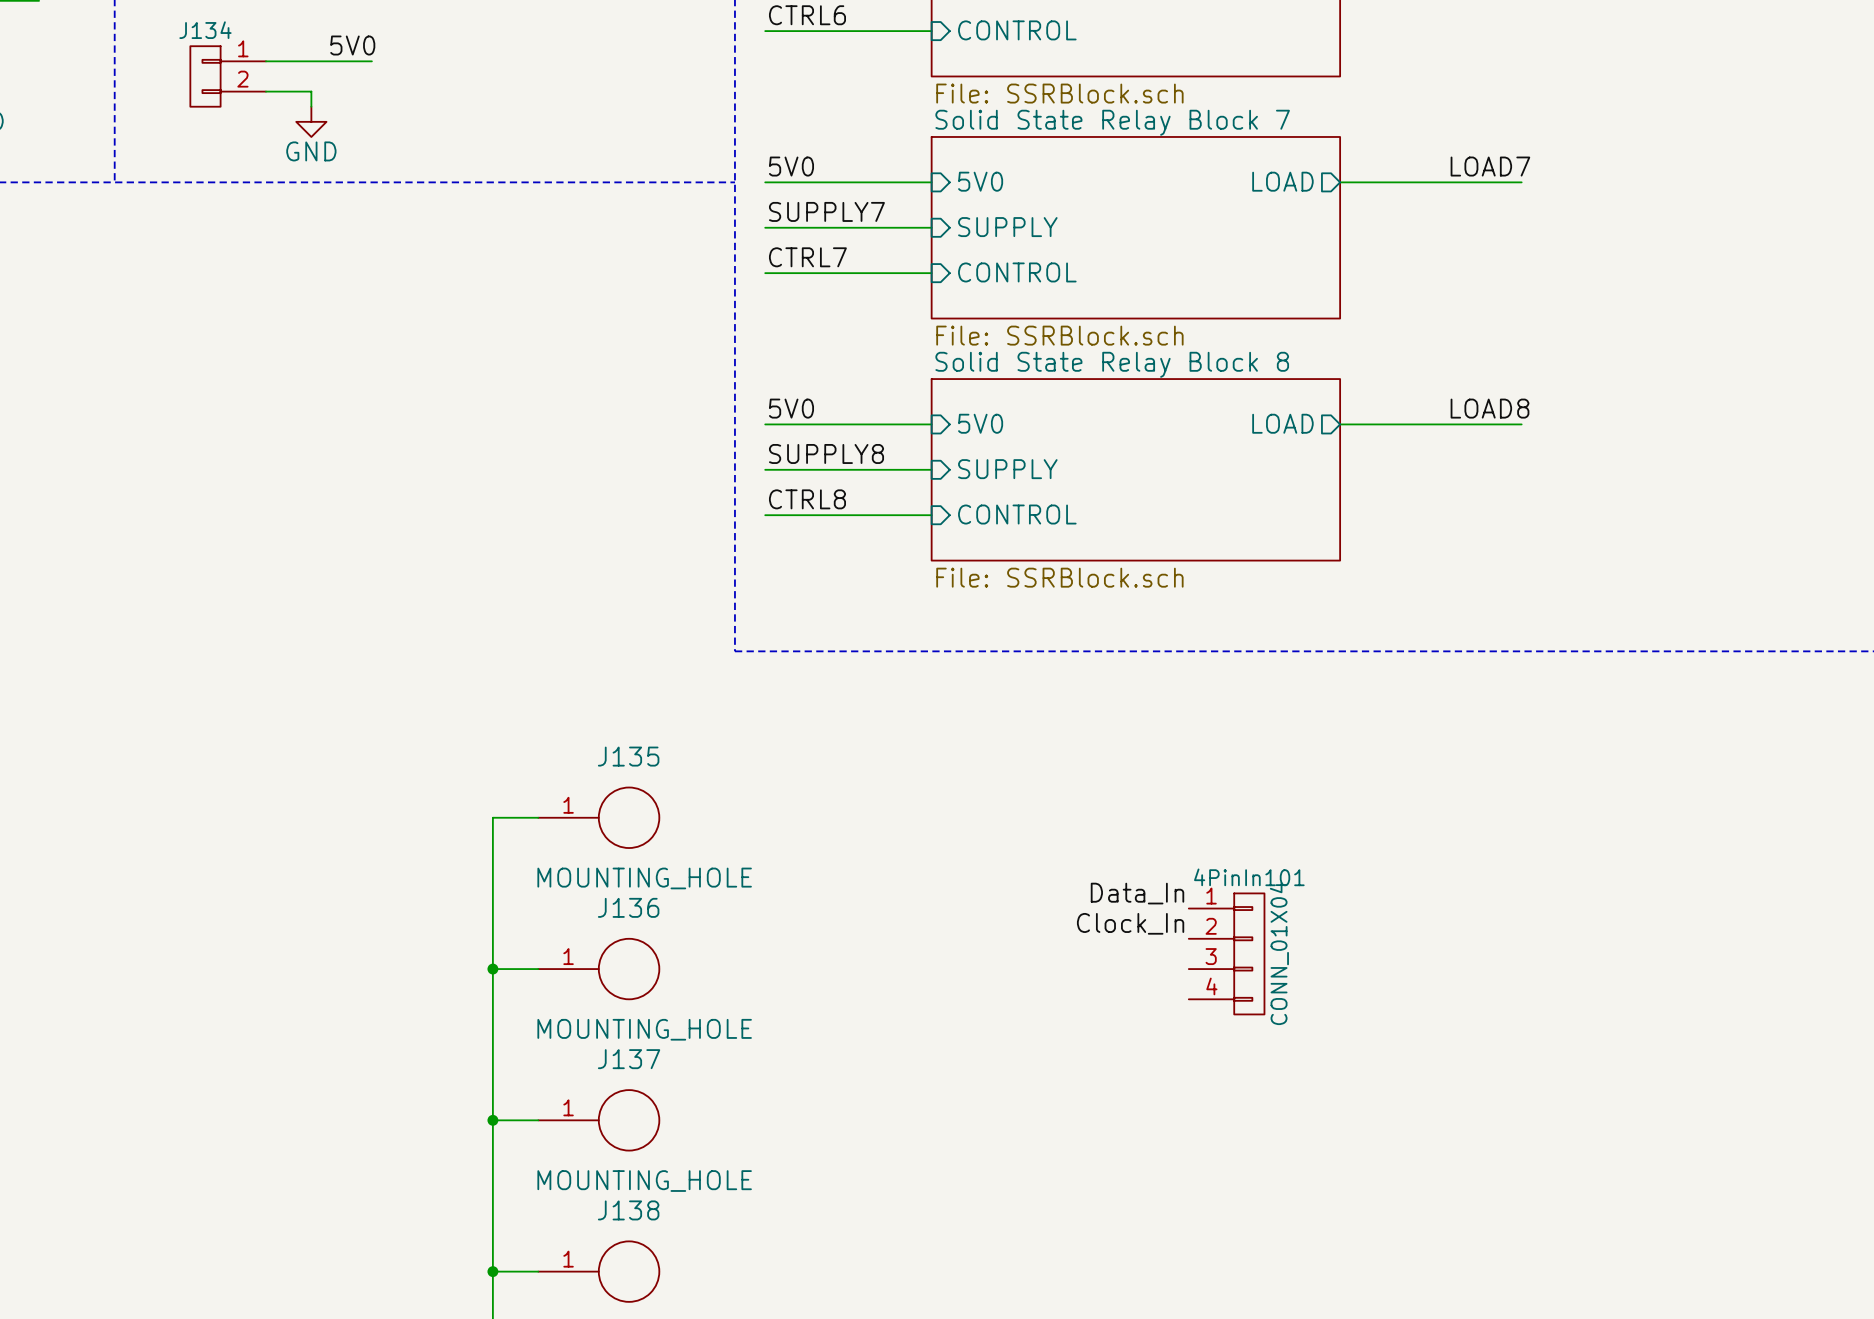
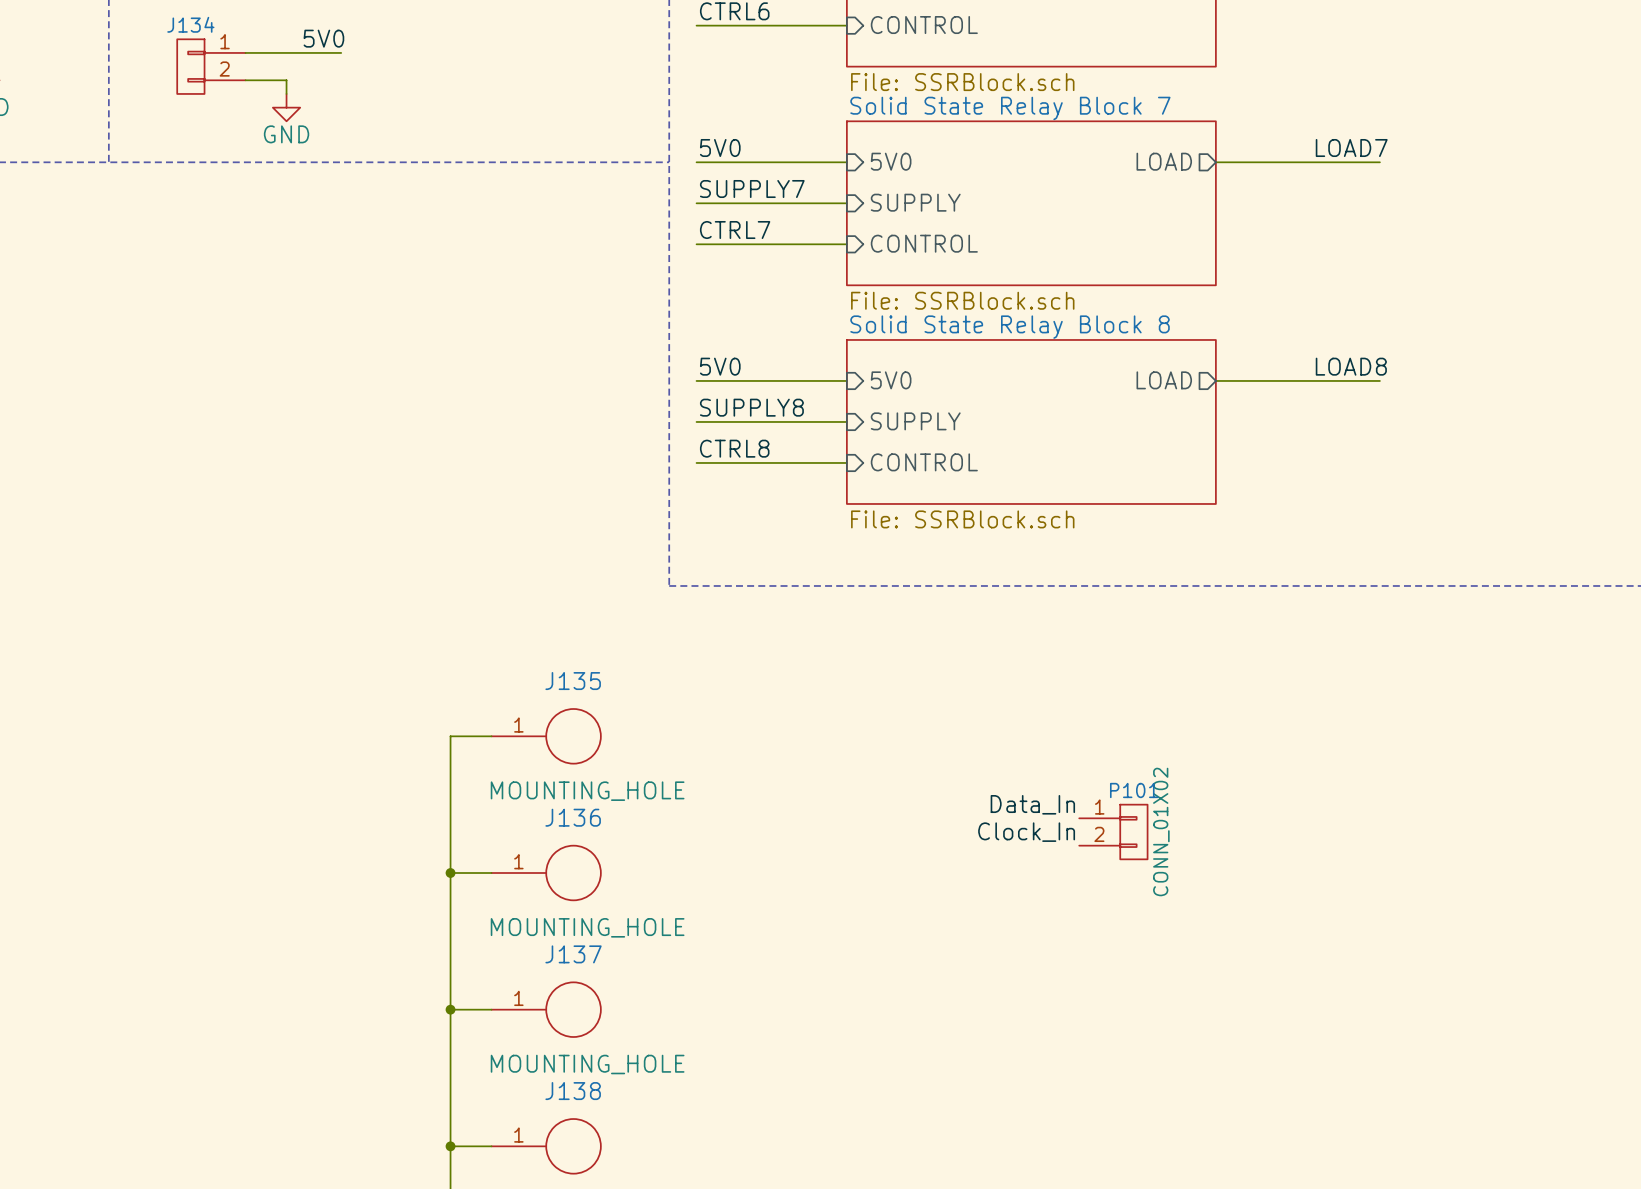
P101: none -> CONN_01X02 (1113, 832)
4PinIn101: CONN_01X04 (1226, 953) -> none

